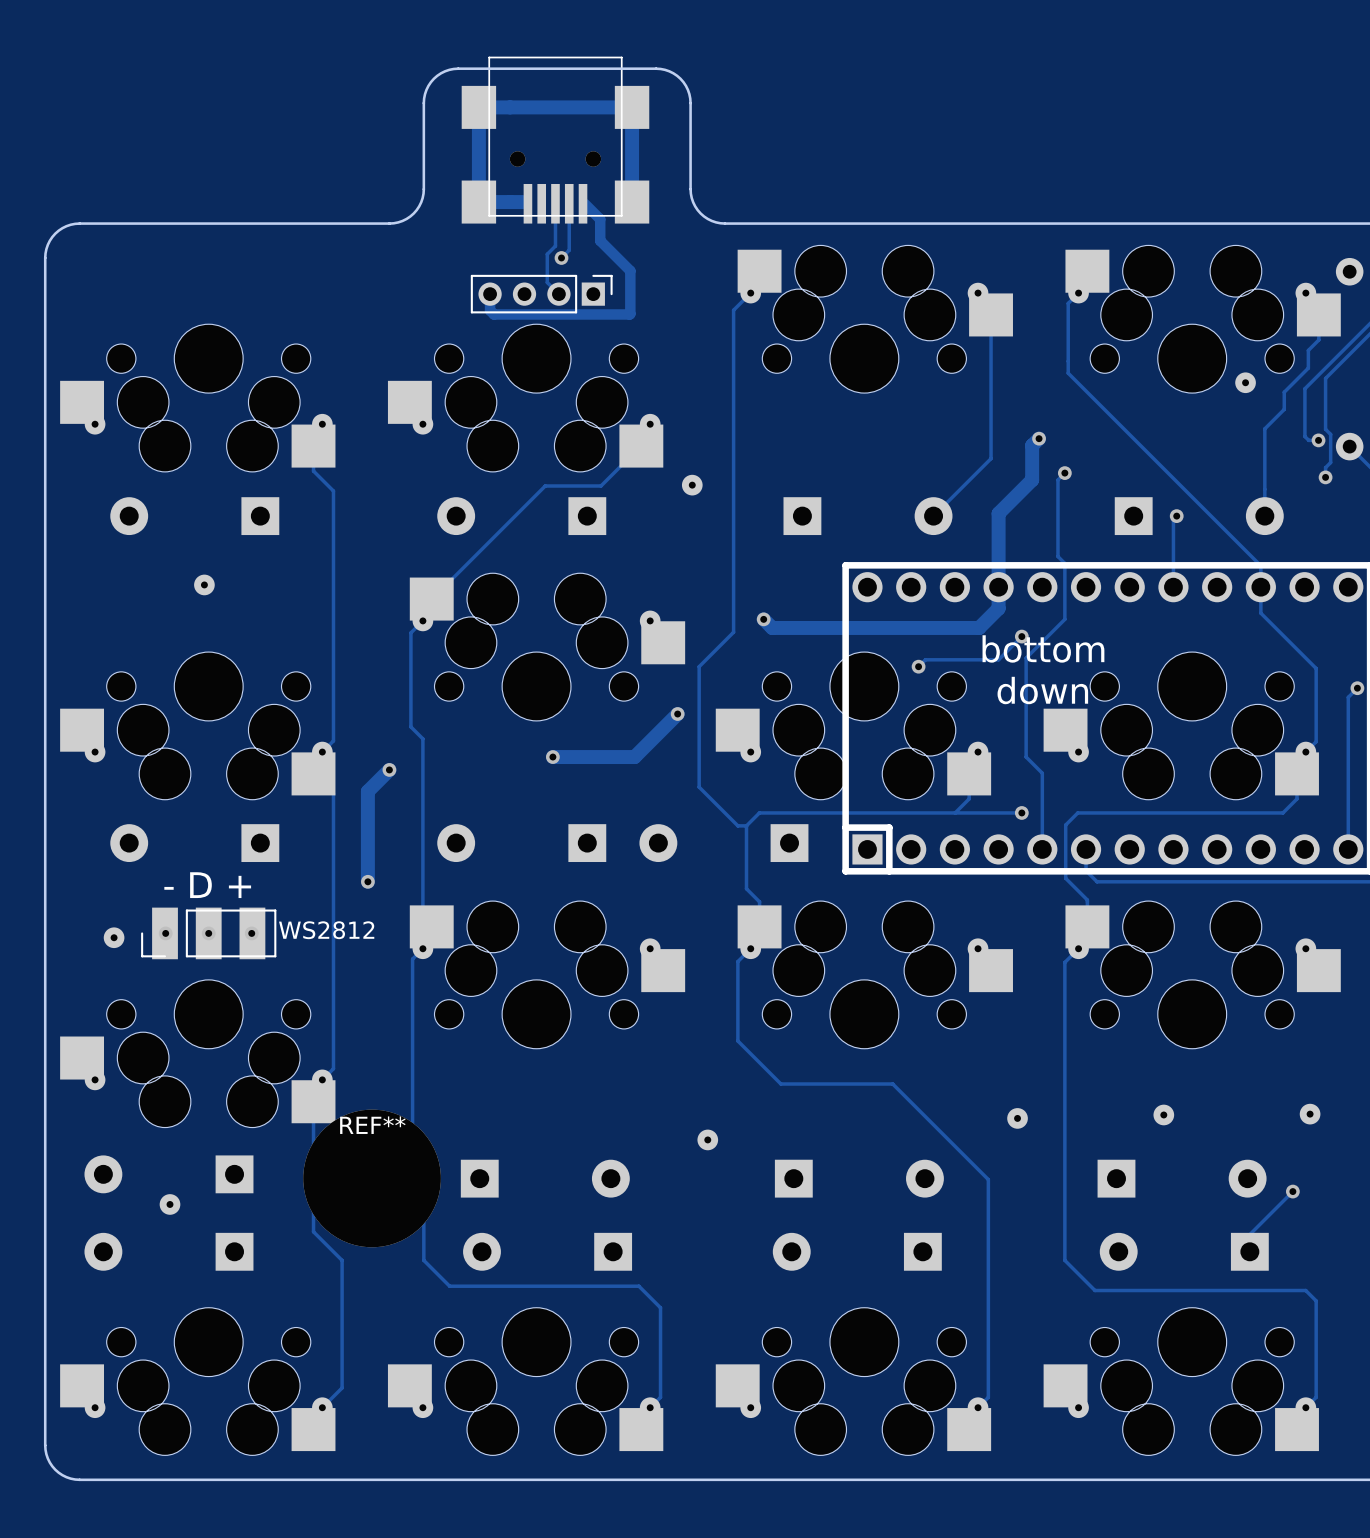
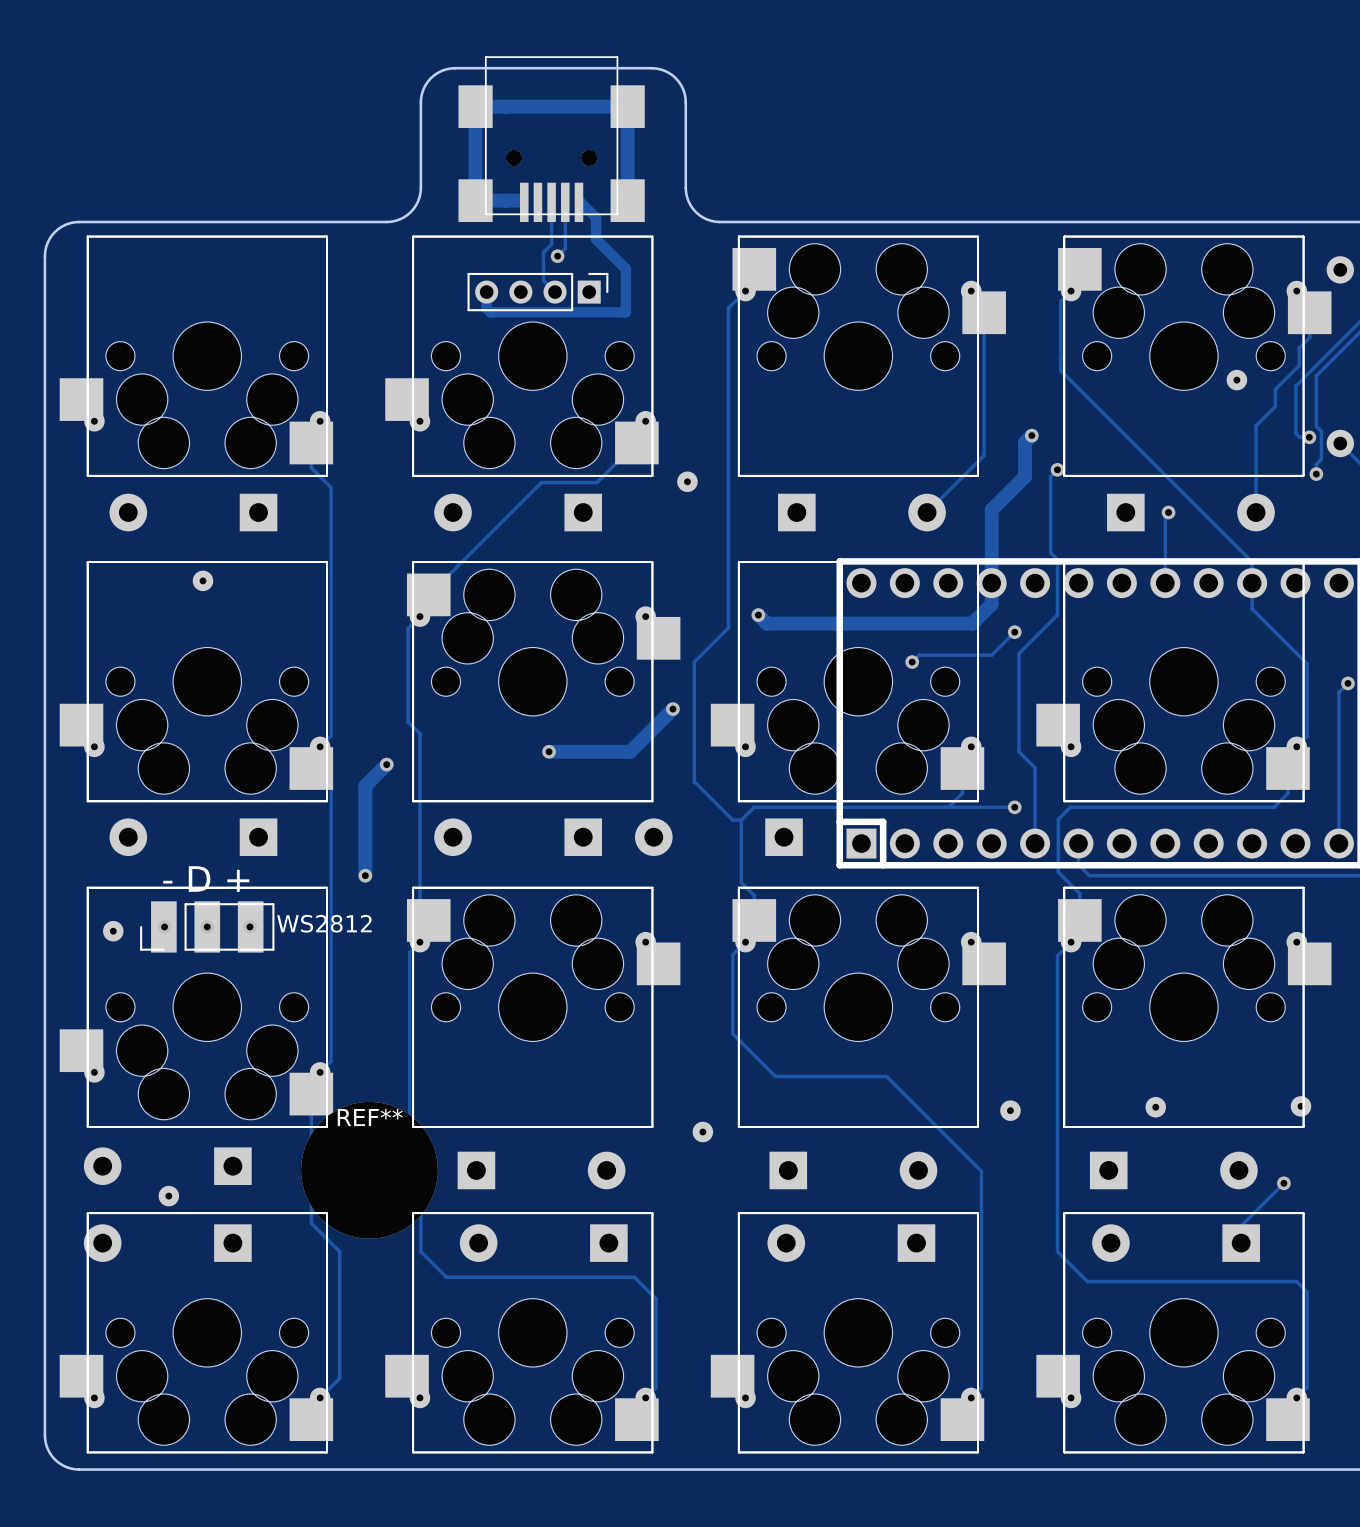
part footprint: [461, 56, 650, 224] -> [458, 56, 645, 223]
part: (875, 319) -> none
part: (1203, 319) -> none
part: none -> (196, 356)
part: none -> (521, 356)
part: none -> (869, 356)
part: none -> (1194, 356)
part: (197, 398) -> none
part: (525, 398) -> none
part: (547, 647) -> none
text: bottom (1043, 648) -> none
part: none -> (196, 681)
part: none -> (543, 681)
part: none -> (847, 681)
part: none -> (1173, 681)
text: down (1042, 690) -> none
part: (197, 725) -> none
part: (853, 725) -> none
part: (1181, 725) -> none
part: (547, 974) -> none
part: (875, 974) -> none
part: (1203, 974) -> none
part: none -> (196, 1007)
part: none -> (543, 1007)
part: none -> (869, 1007)
part: none -> (1194, 1007)
part: (197, 1053) -> none
part: none -> (196, 1332)
part: none -> (521, 1332)
part: none -> (847, 1332)
part: none -> (1173, 1332)
part: (197, 1381) -> none
part: (525, 1381) -> none
part: (853, 1381) -> none
part: (1181, 1381) -> none

